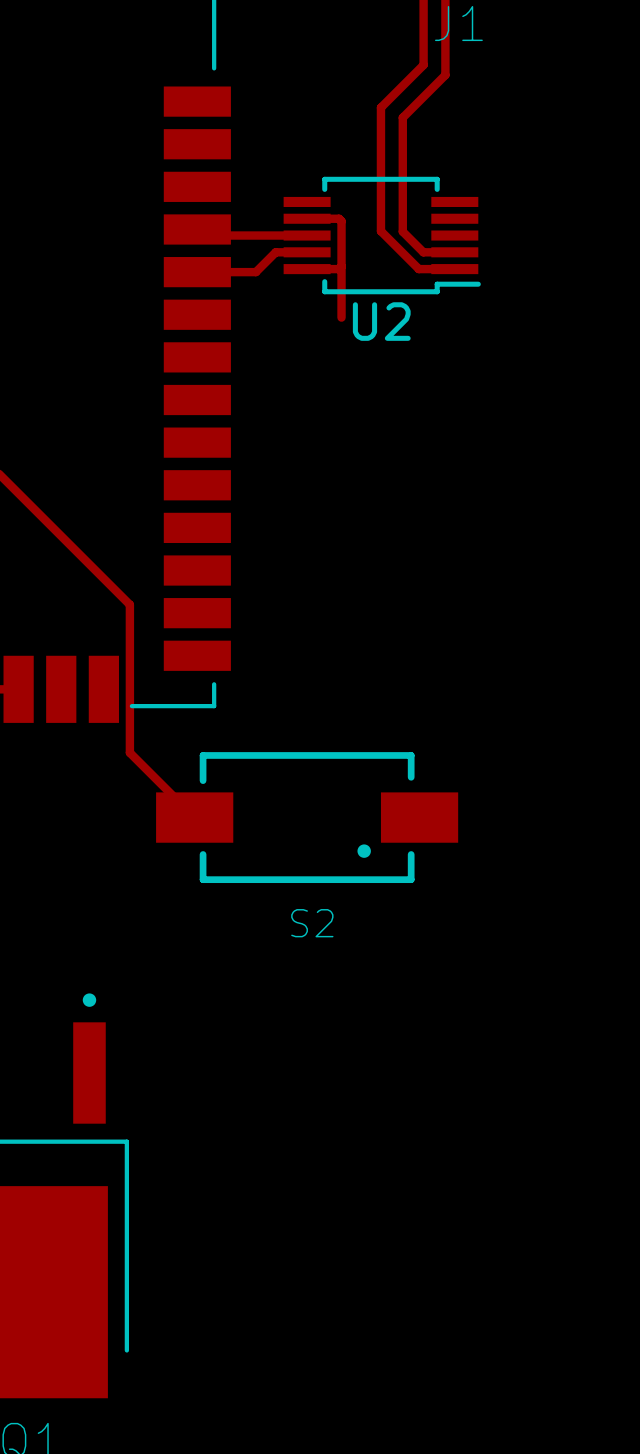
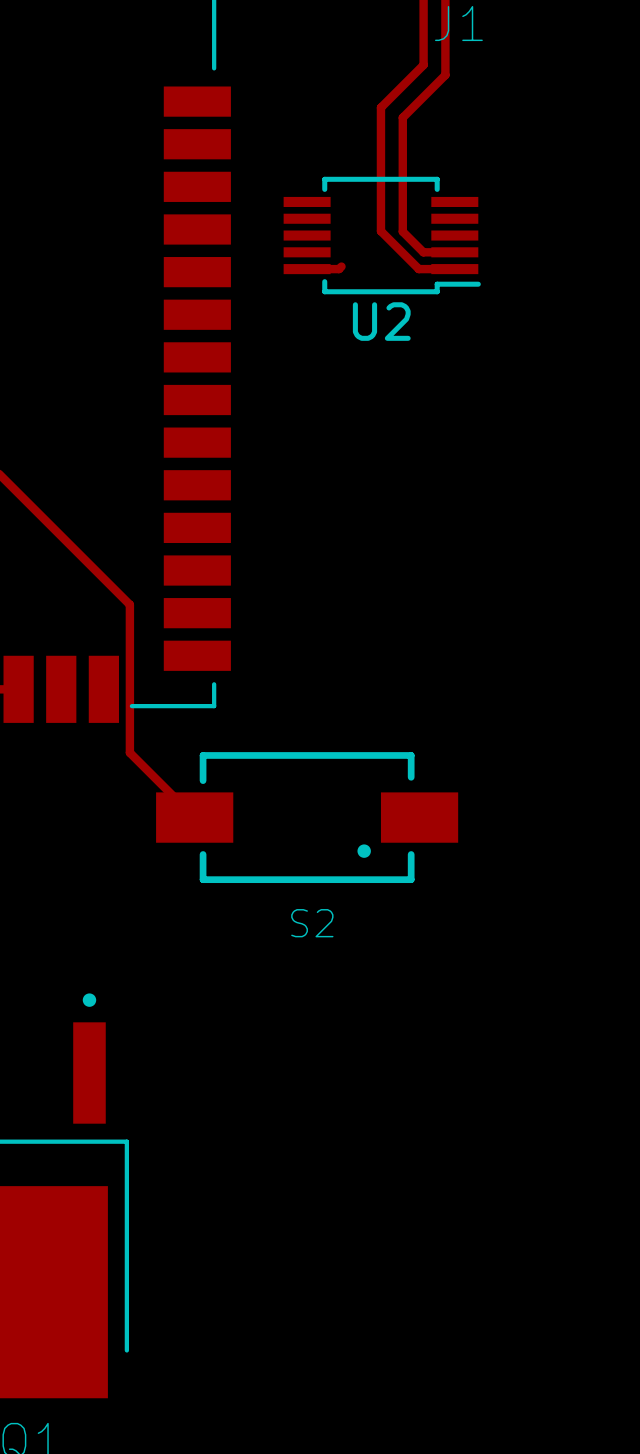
top track: (307, 218) (339, 218) (341, 221) (341, 317) -> none
top track: (197, 229) (203, 235) (307, 235) -> none
top track: (307, 252) (275, 252) (255, 272) (197, 272) -> none

